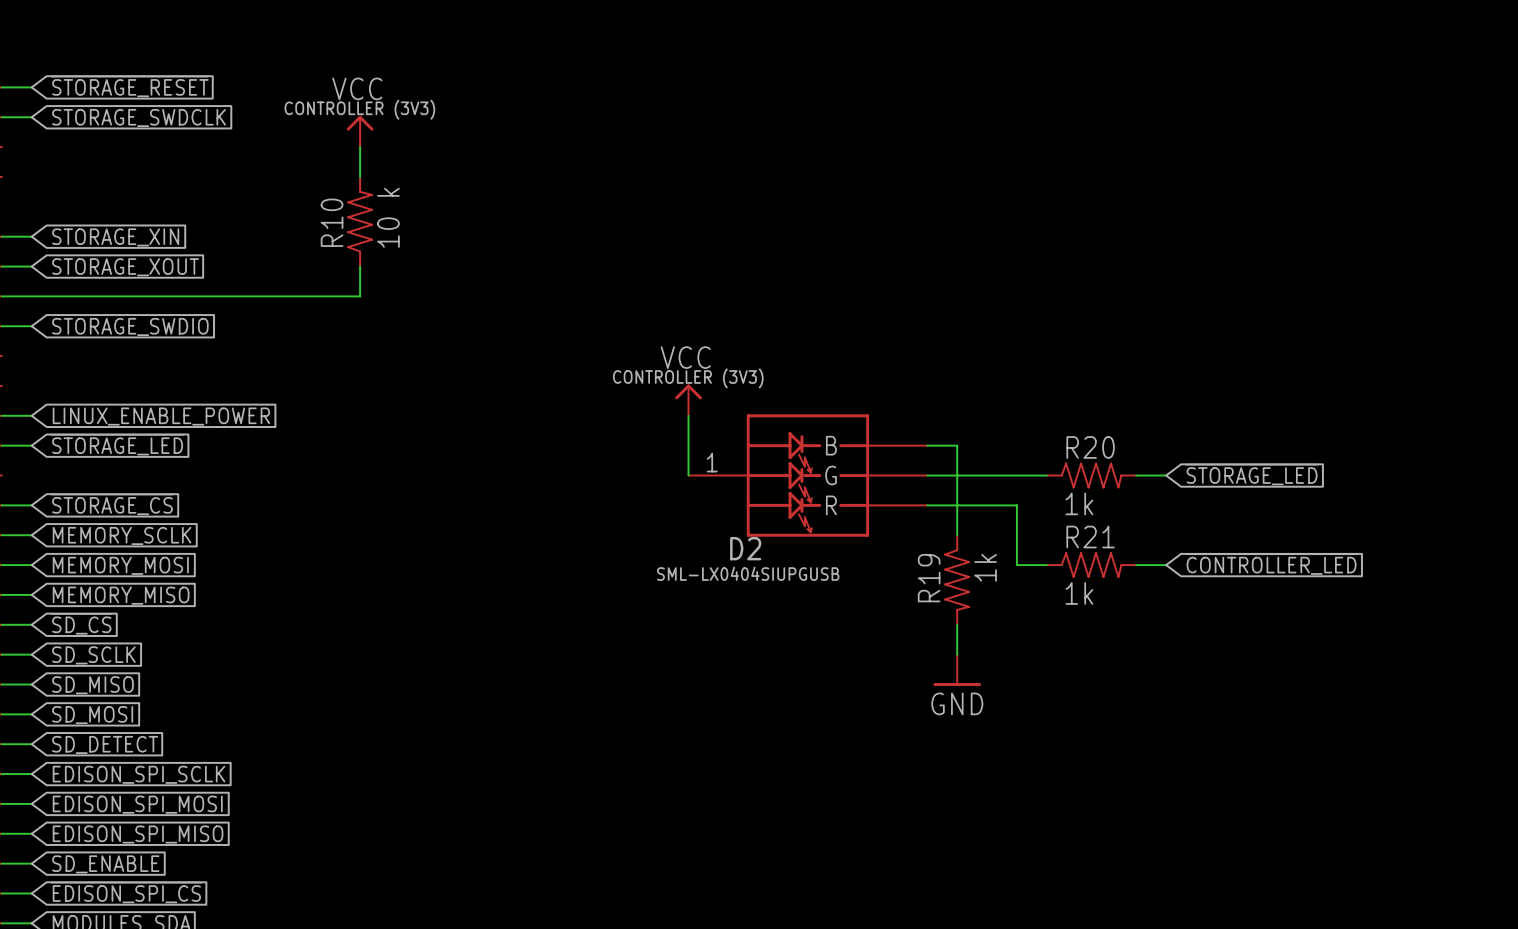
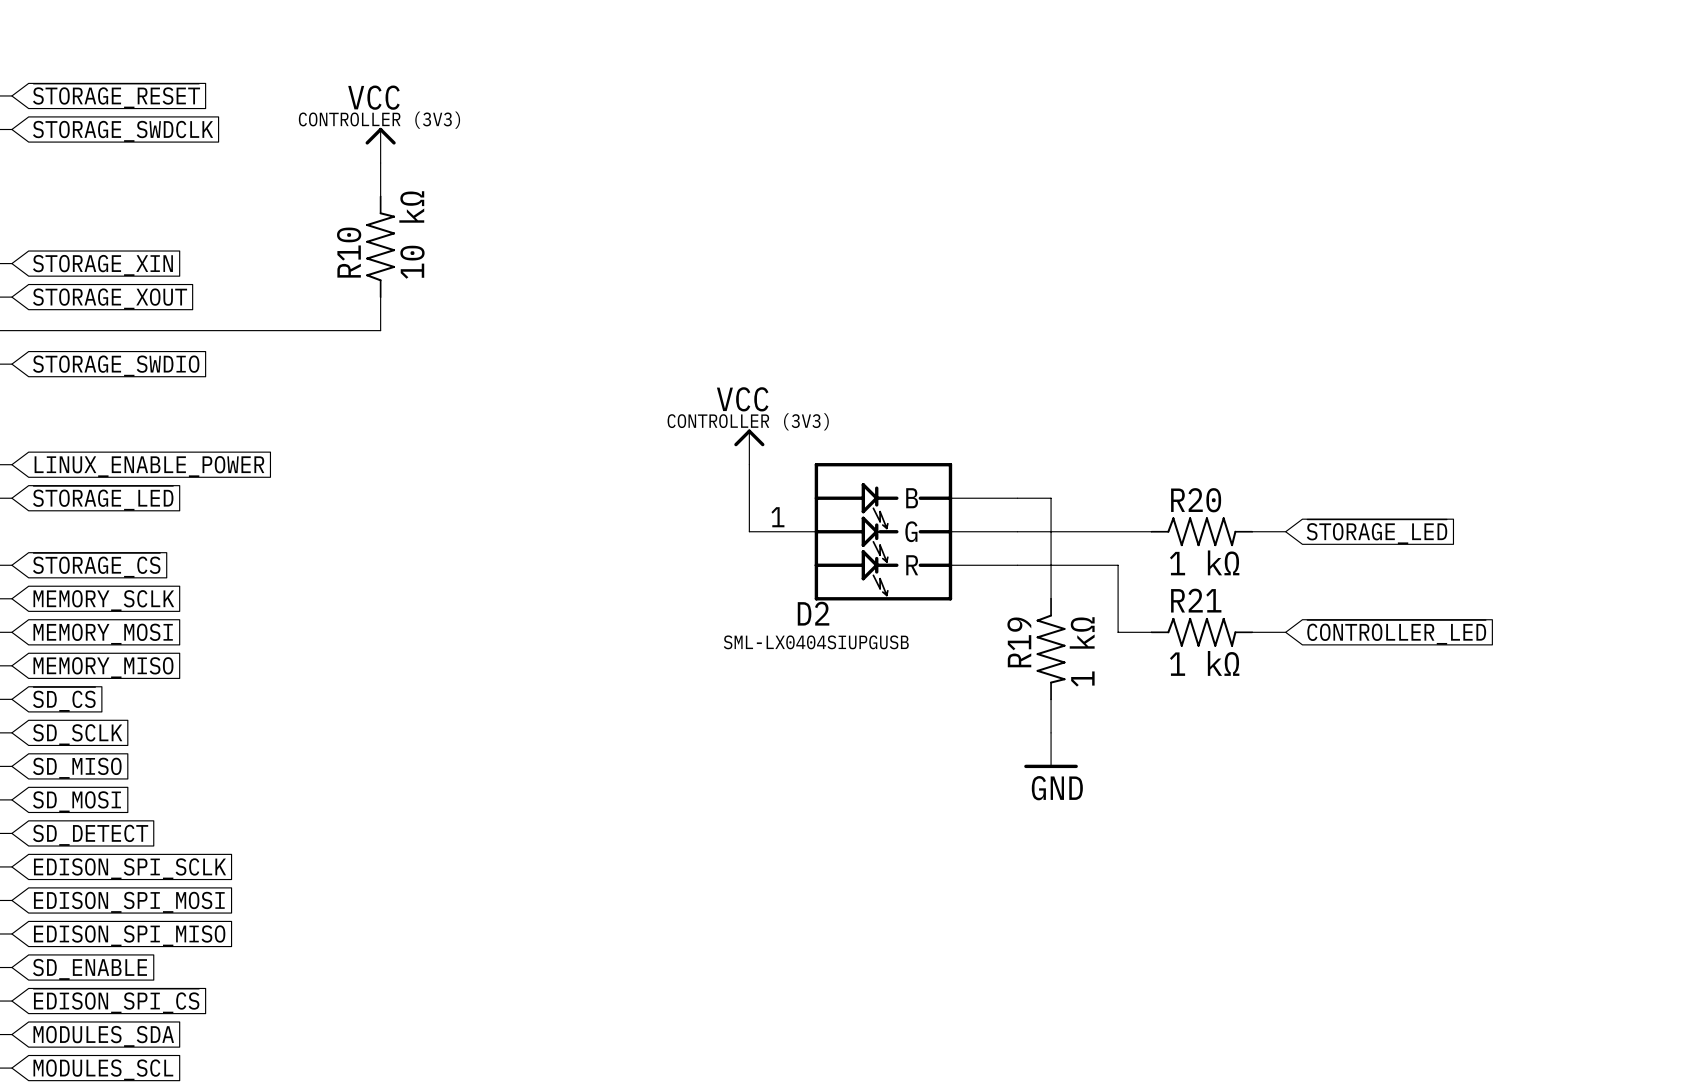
R10 value: 10 k (388, 217) -> 10 kΩ (411, 234)
R20 value: 1k (1079, 503) -> 1 kΩ (1204, 562)
R19 value: 1k (985, 567) -> 1 kΩ (1082, 651)
R21 value: 1k (1079, 593) -> 1 kΩ (1204, 663)

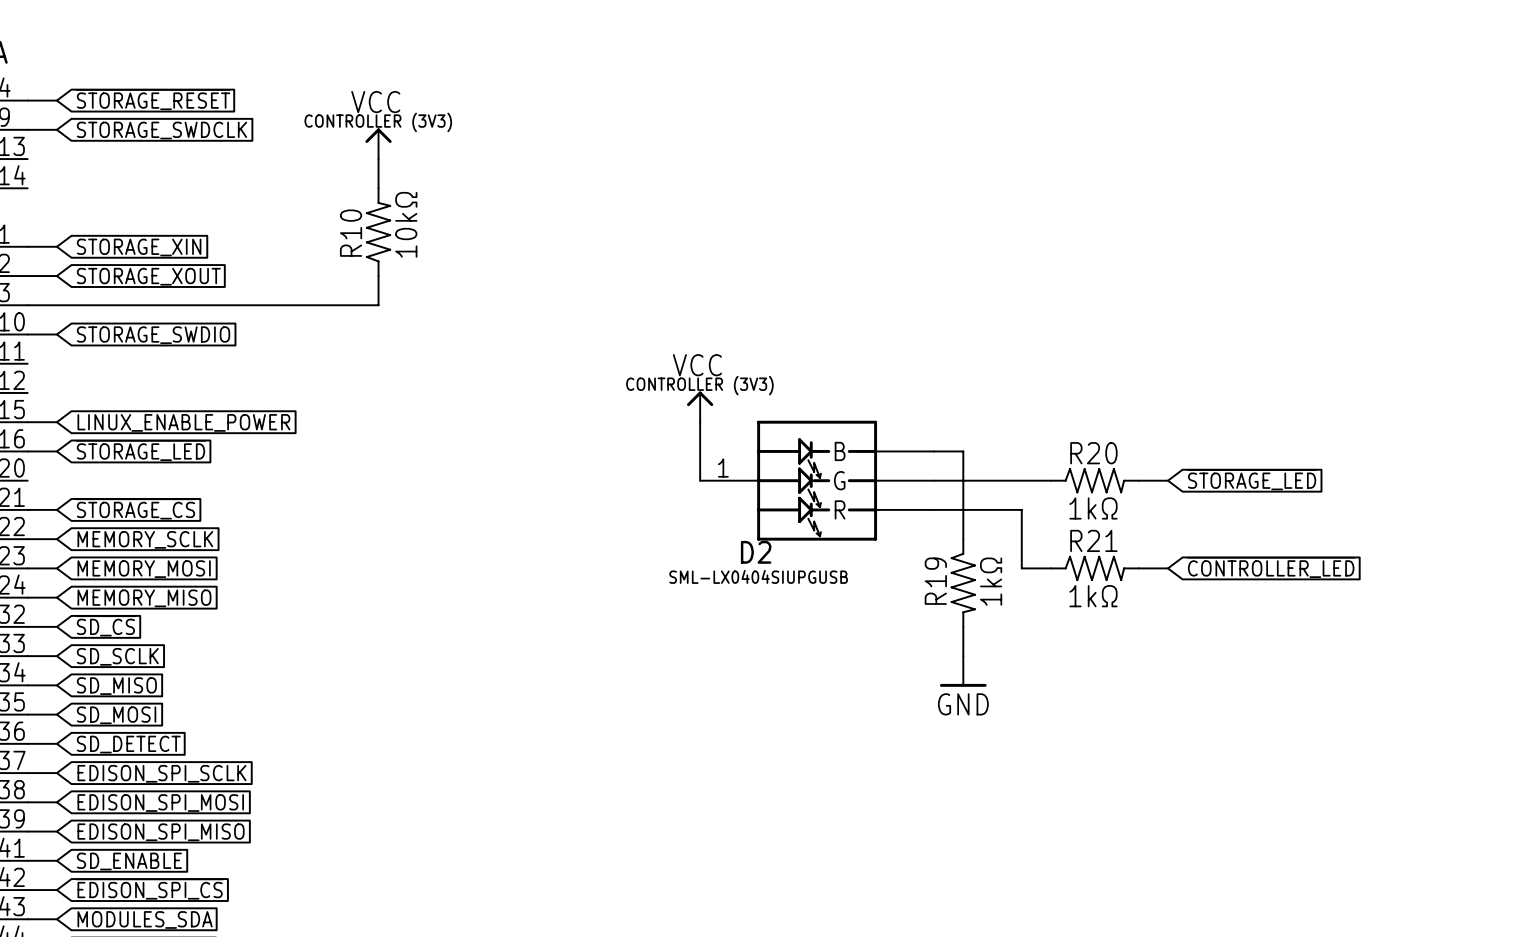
R10 value: 10 kΩ (411, 234) -> 10kΩ (406, 224)
R20 value: 1 kΩ (1204, 562) -> 1kΩ (1093, 508)
R19 value: 1 kΩ (1082, 651) -> 1kΩ (991, 581)
R21 value: 1 kΩ (1204, 663) -> 1kΩ (1093, 596)

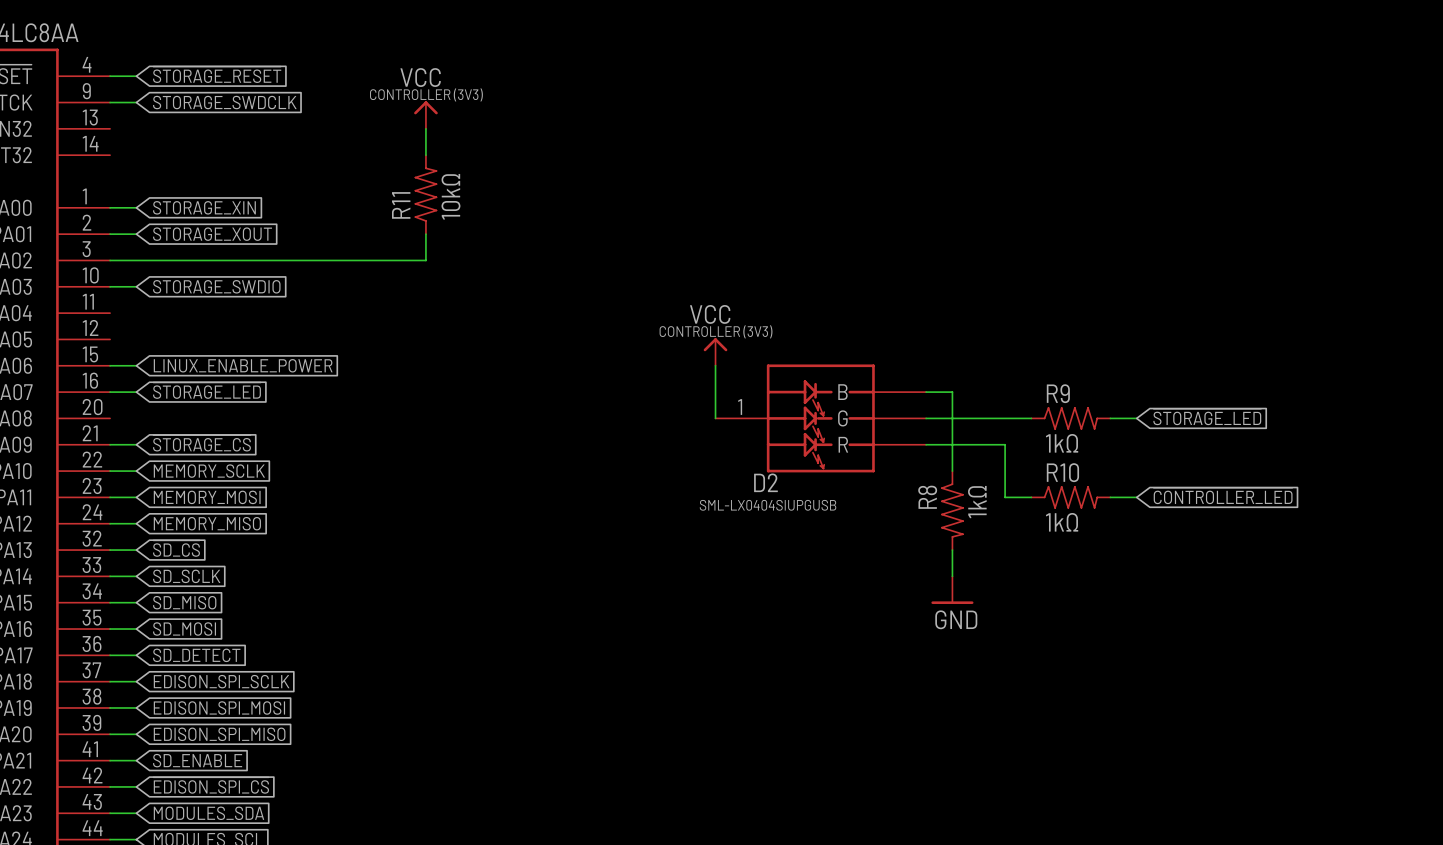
R10 name: R10 (351, 233) -> R11 (401, 205)
R20 name: R20 (1093, 453) -> R9 (1058, 393)
R21 name: R21 (1093, 540) -> R10 (1062, 472)
R19 name: R19 (935, 581) -> R8 (927, 497)

